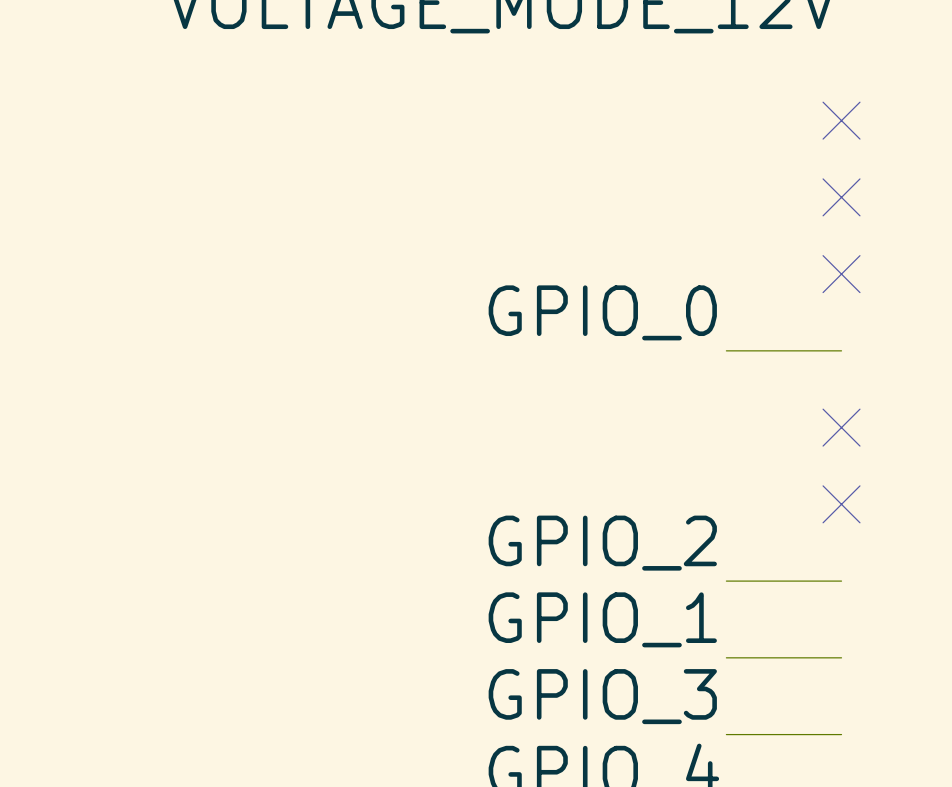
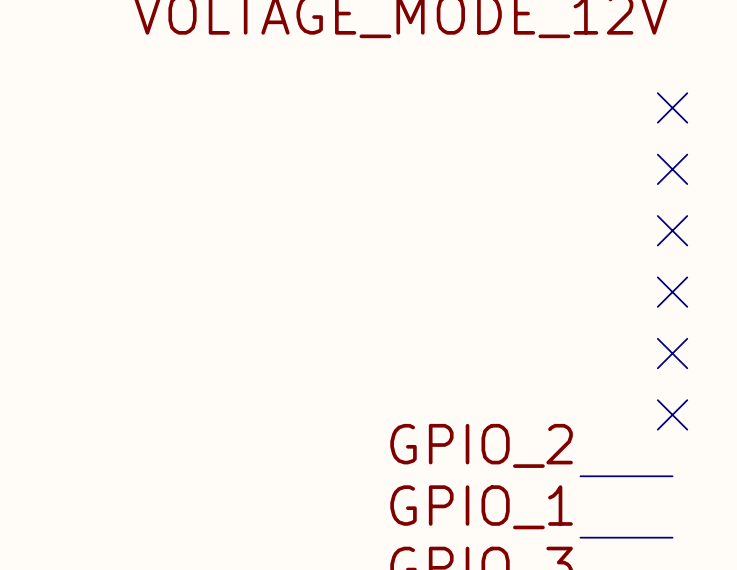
label: GPIO_0 (602, 312) -> none
wire: (726, 350) (841, 350) -> none
no-connect mark: none -> (672, 292)

